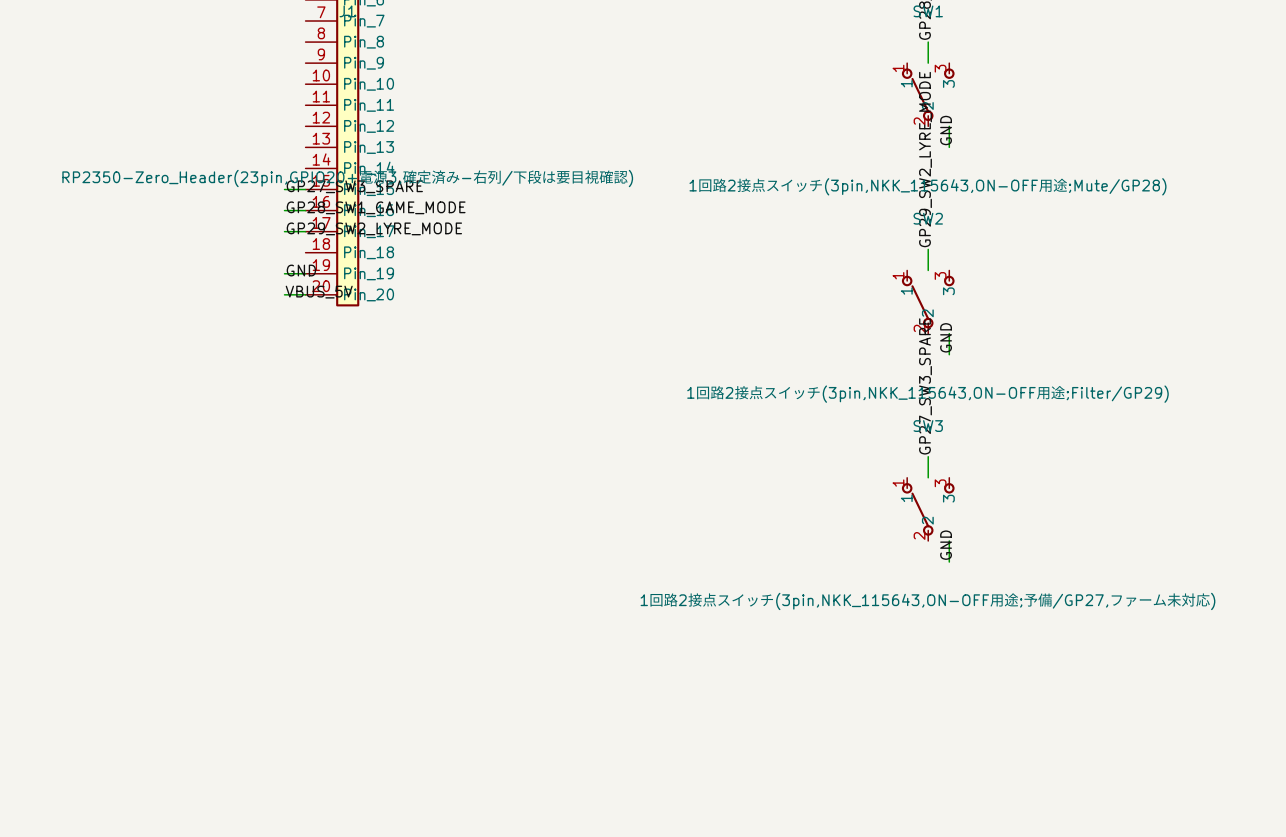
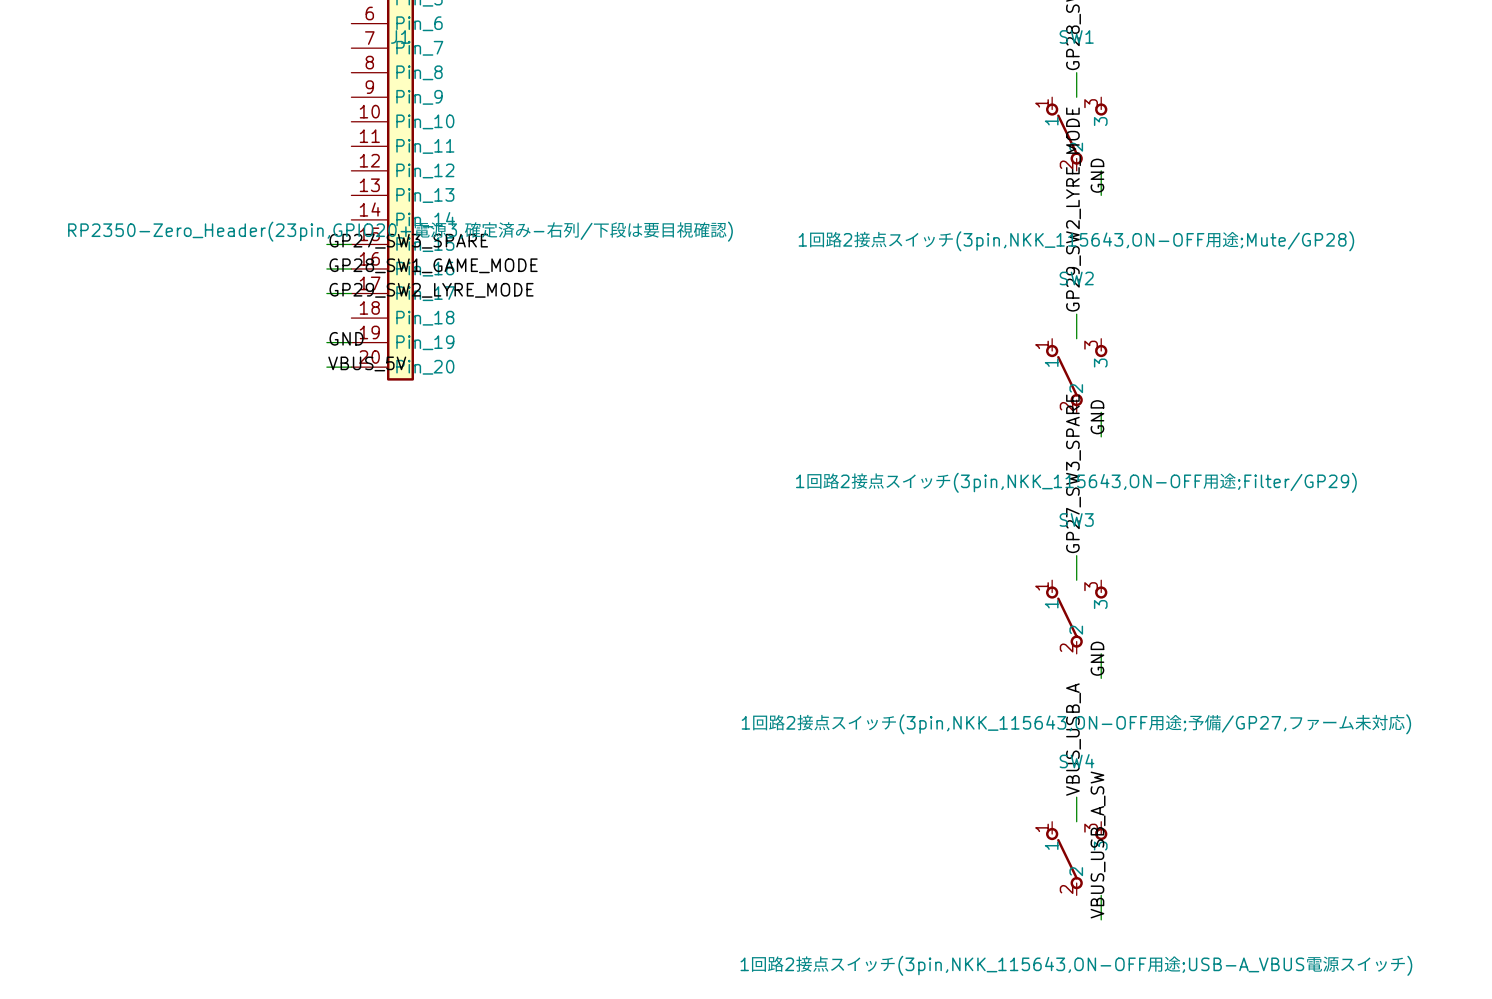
label: none -> VBUS_USB_A (1073, 739)
wire: none -> (1076, 797) (1076, 821)
label: none -> VBUS_USB_A_SW (1098, 845)
SW4: none -> 1回路2接点スイッチ(3pin,NKK_115643,ON-OFF用途;USB-A_VBUS電源スイッチ) (1076, 858)
wire: none -> (1101, 895) (1101, 919)

